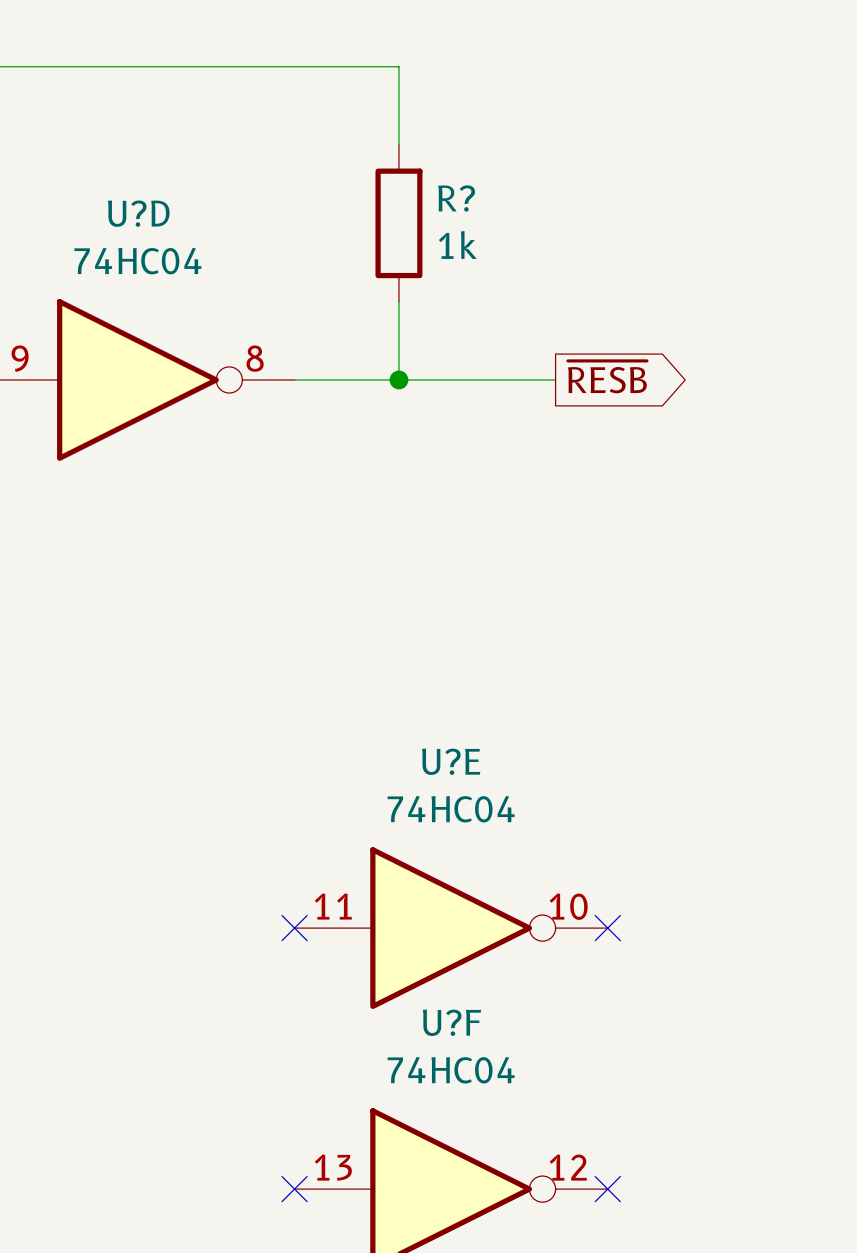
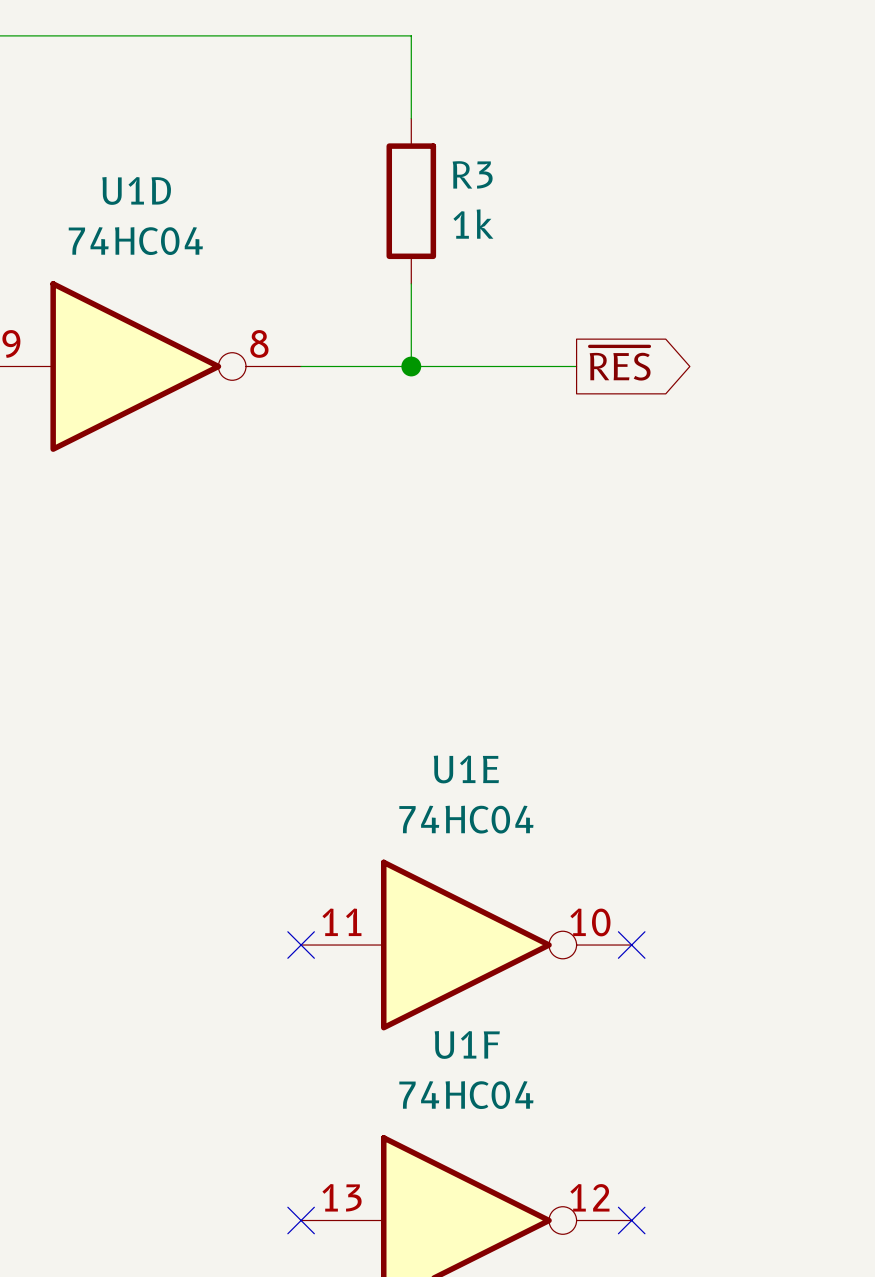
R? name: R? (456, 198) -> R3 (472, 174)
U?D name: U?D (138, 213) -> U1D (136, 190)
global label: ~{RESB} (607, 377) -> ~{RES} (620, 363)
U?E name: U?E (451, 761) -> U1E (466, 769)
U?F name: U?F (451, 1022) -> U1F (467, 1044)

